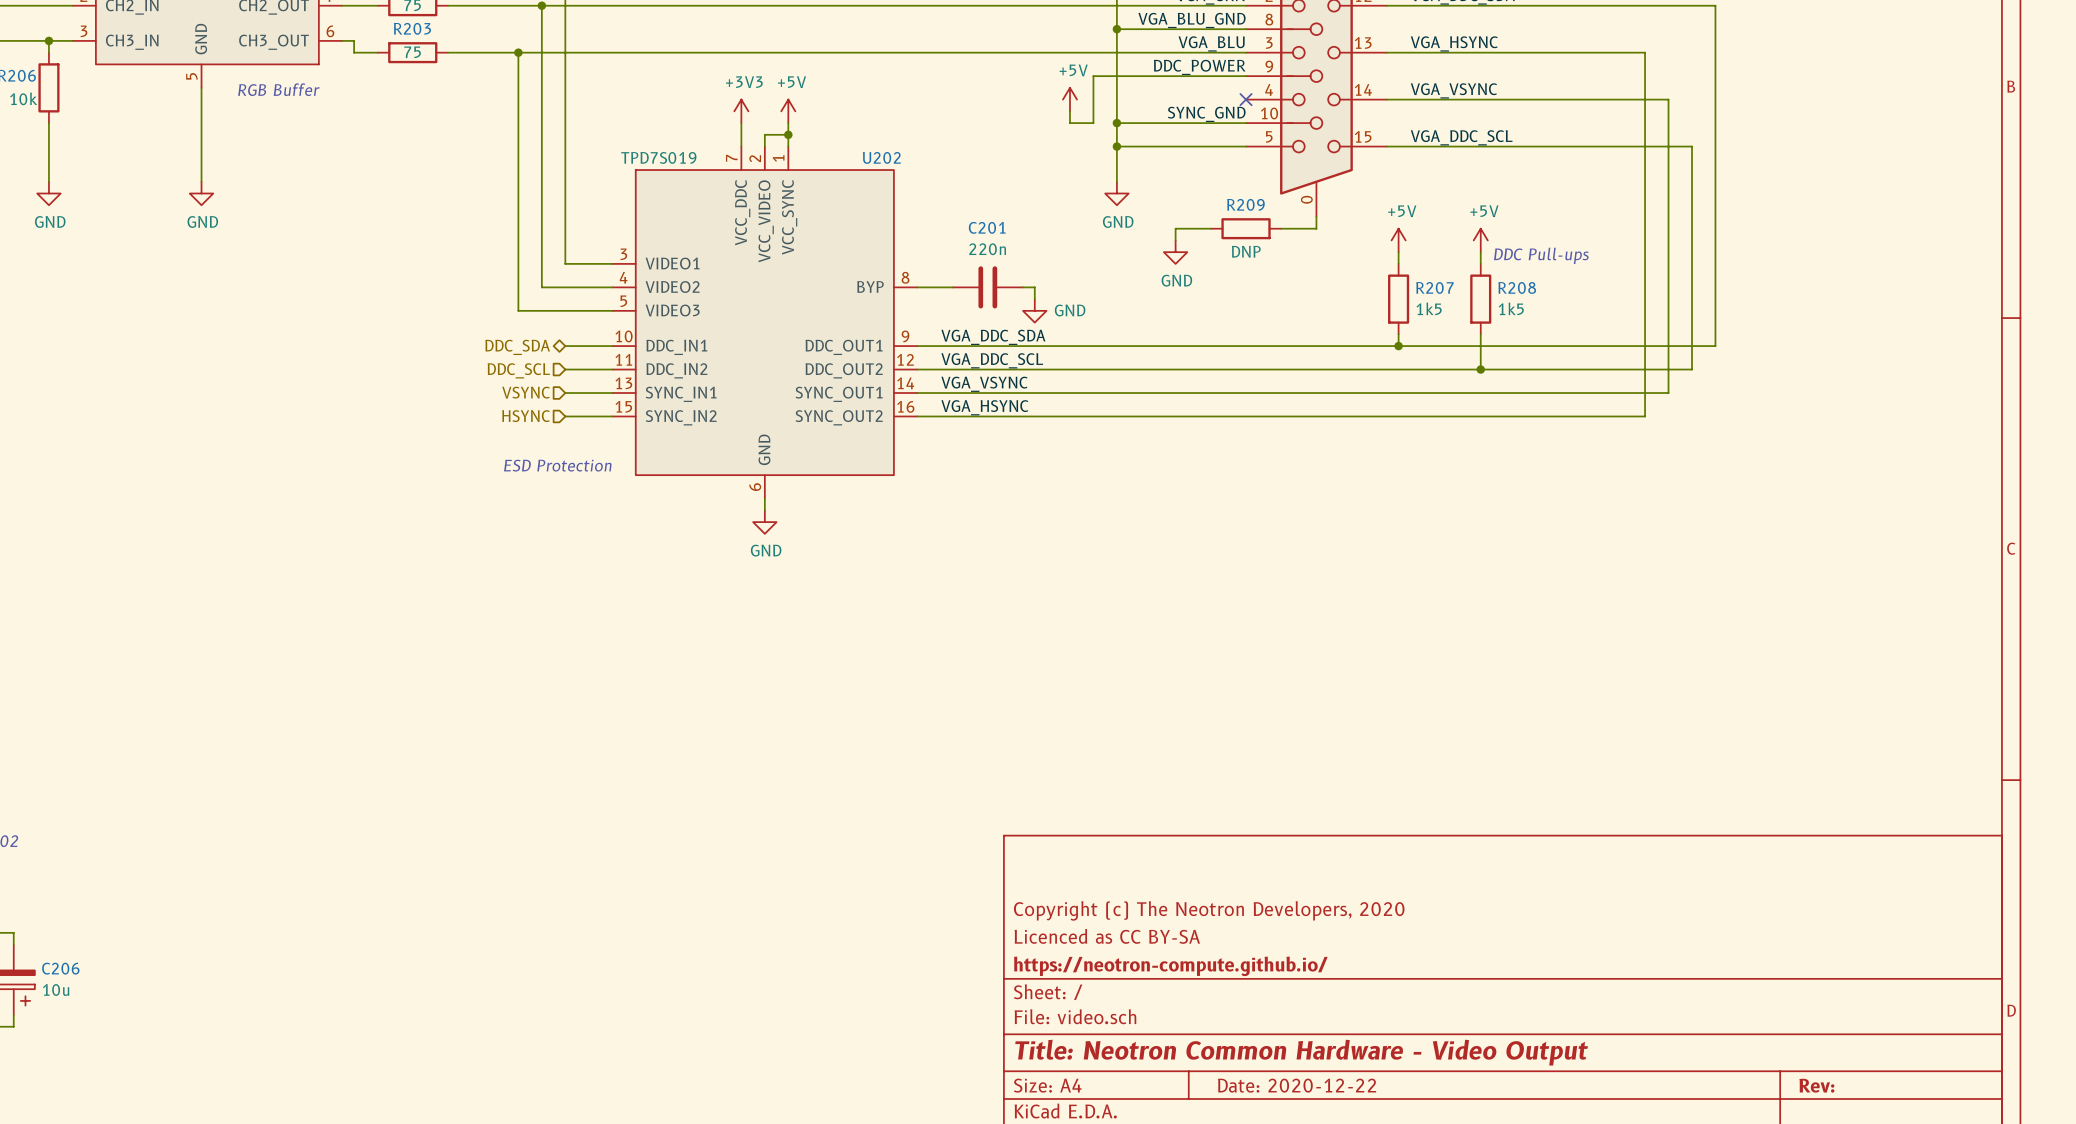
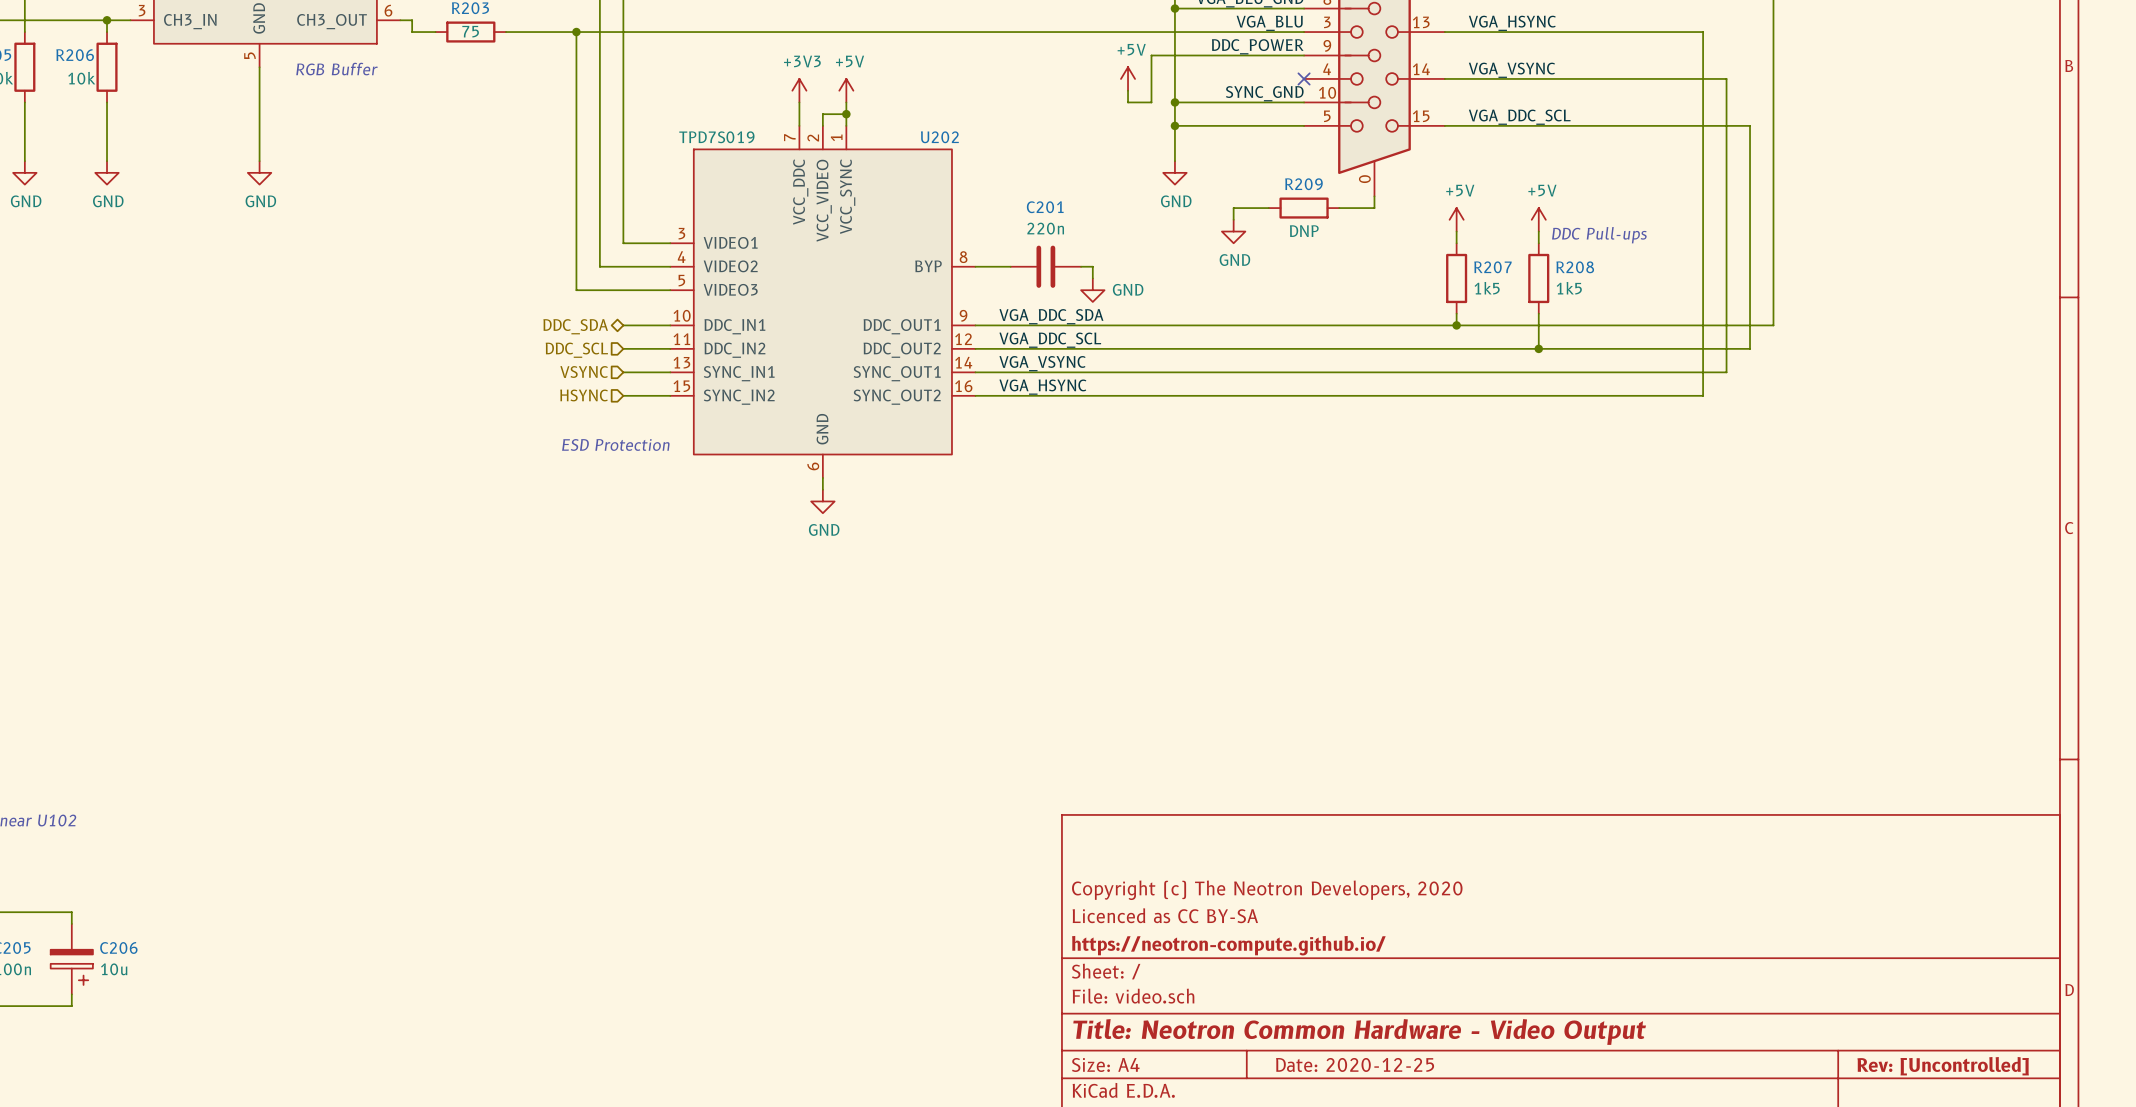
title block: Date: 2020-12-22 (1297, 1085) -> Date: 2020-12-25 (1355, 1064)
title block: Rev: (1816, 1085) -> Rev: [Uncontrolled] (1943, 1066)

